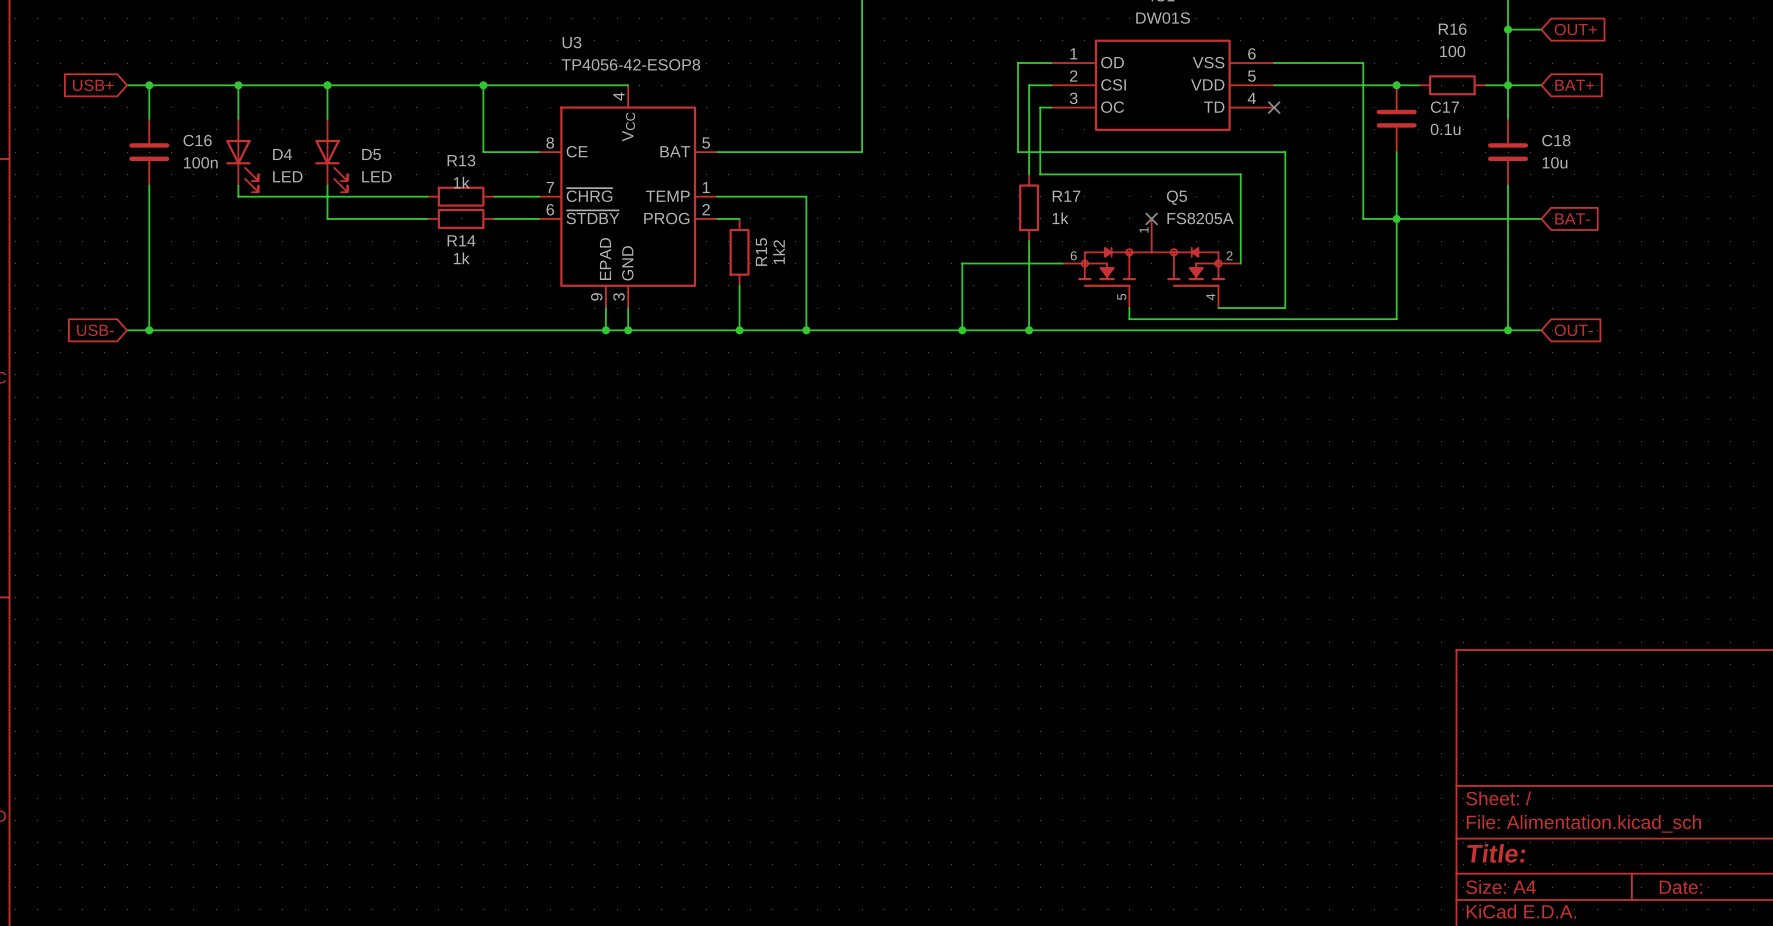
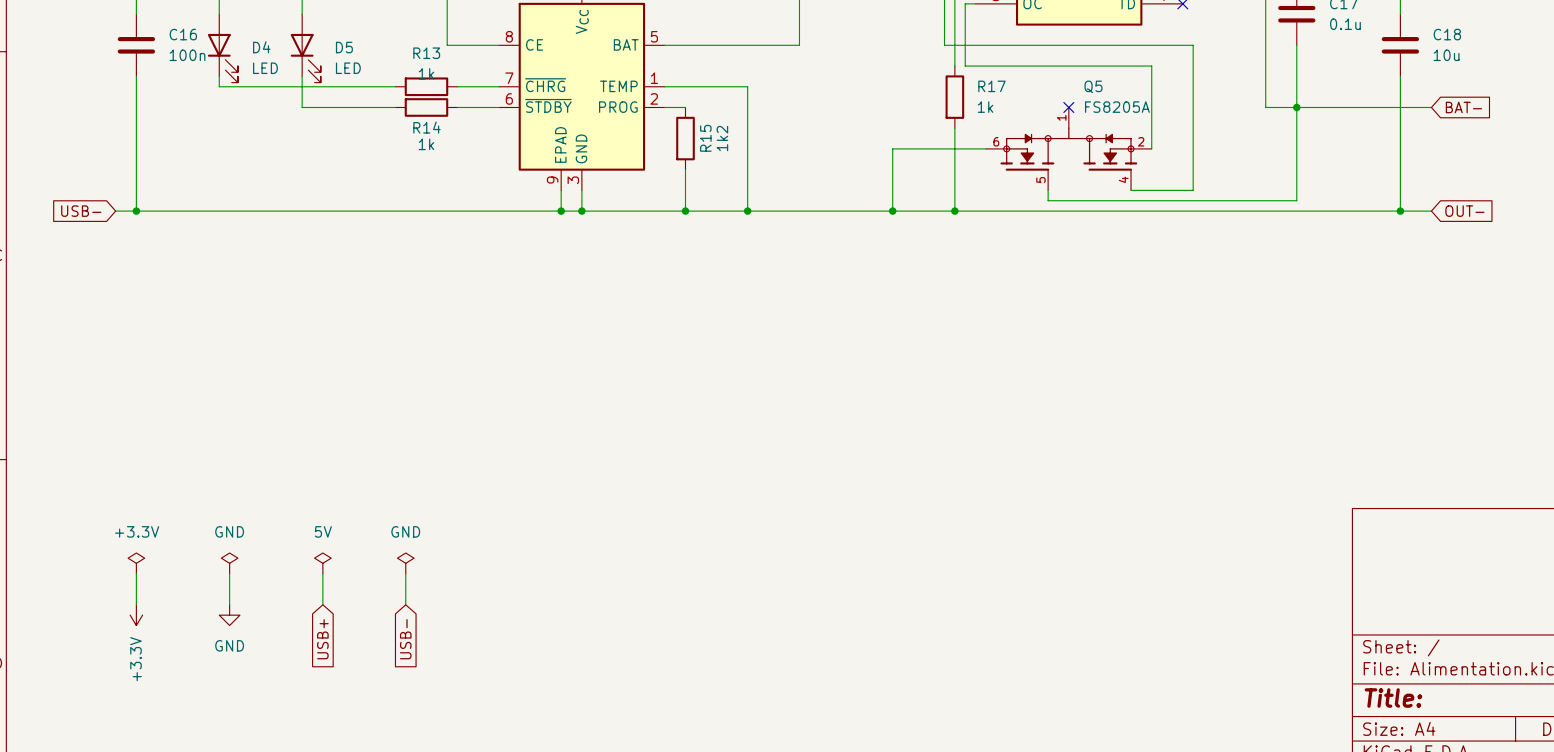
power symbol: none -> +3.3V (136, 563)
power symbol: none -> GND (229, 563)
power symbol: none -> 5V (322, 563)
power symbol: none -> GND (405, 563)
wire: none -> (136, 573) (136, 604)
wire: none -> (229, 573) (229, 604)
wire: none -> (322, 573) (322, 604)
wire: none -> (405, 573) (405, 604)
power symbol: none -> +3.3V (136, 615)
power symbol: none -> GND (229, 615)
global label: none -> USB- (405, 639)
global label: none -> USB+ (322, 639)

